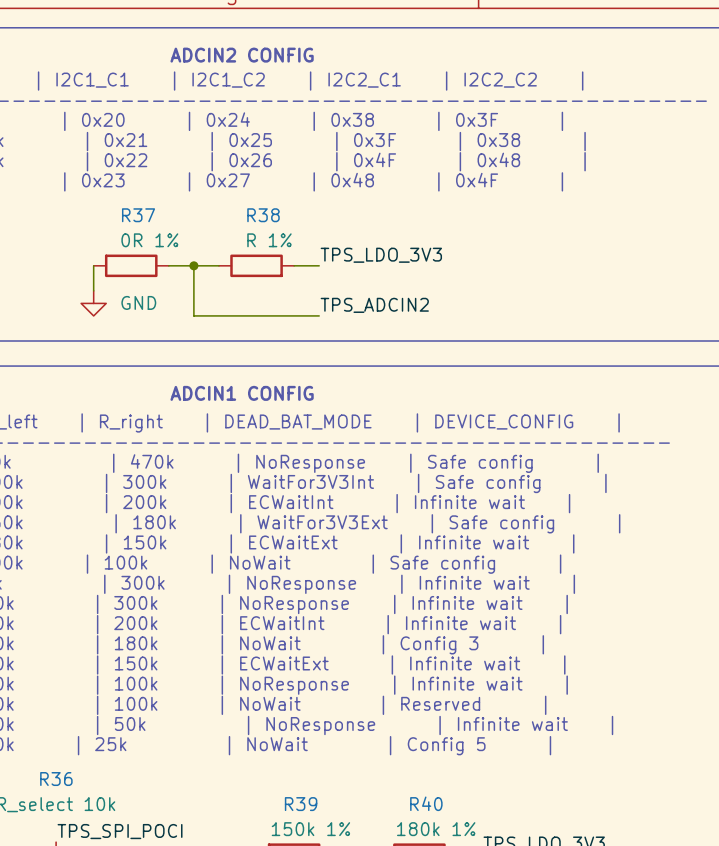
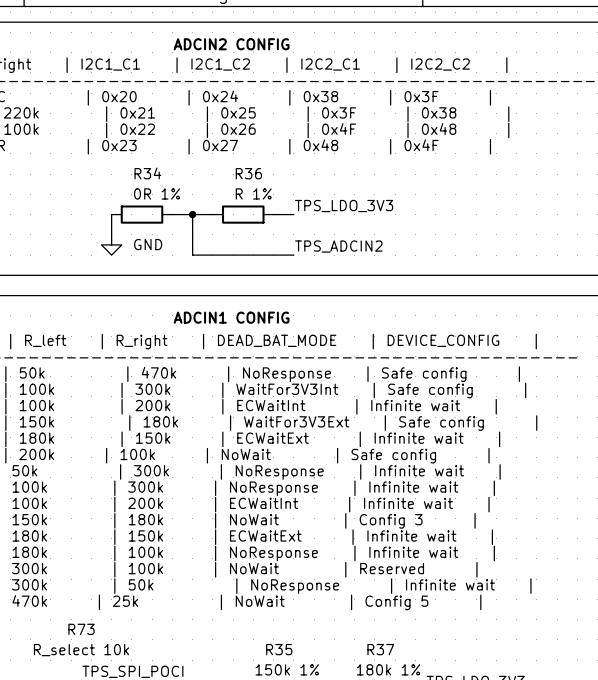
R37 name: R37 (138, 215) -> R34 (147, 173)
R38 name: R38 (263, 215) -> R36 (248, 173)
R36 name: R36 (56, 779) -> R73 (81, 629)
R40 name: R40 (426, 803) -> R37 (380, 649)
R39 name: R39 (301, 804) -> R35 (279, 649)

